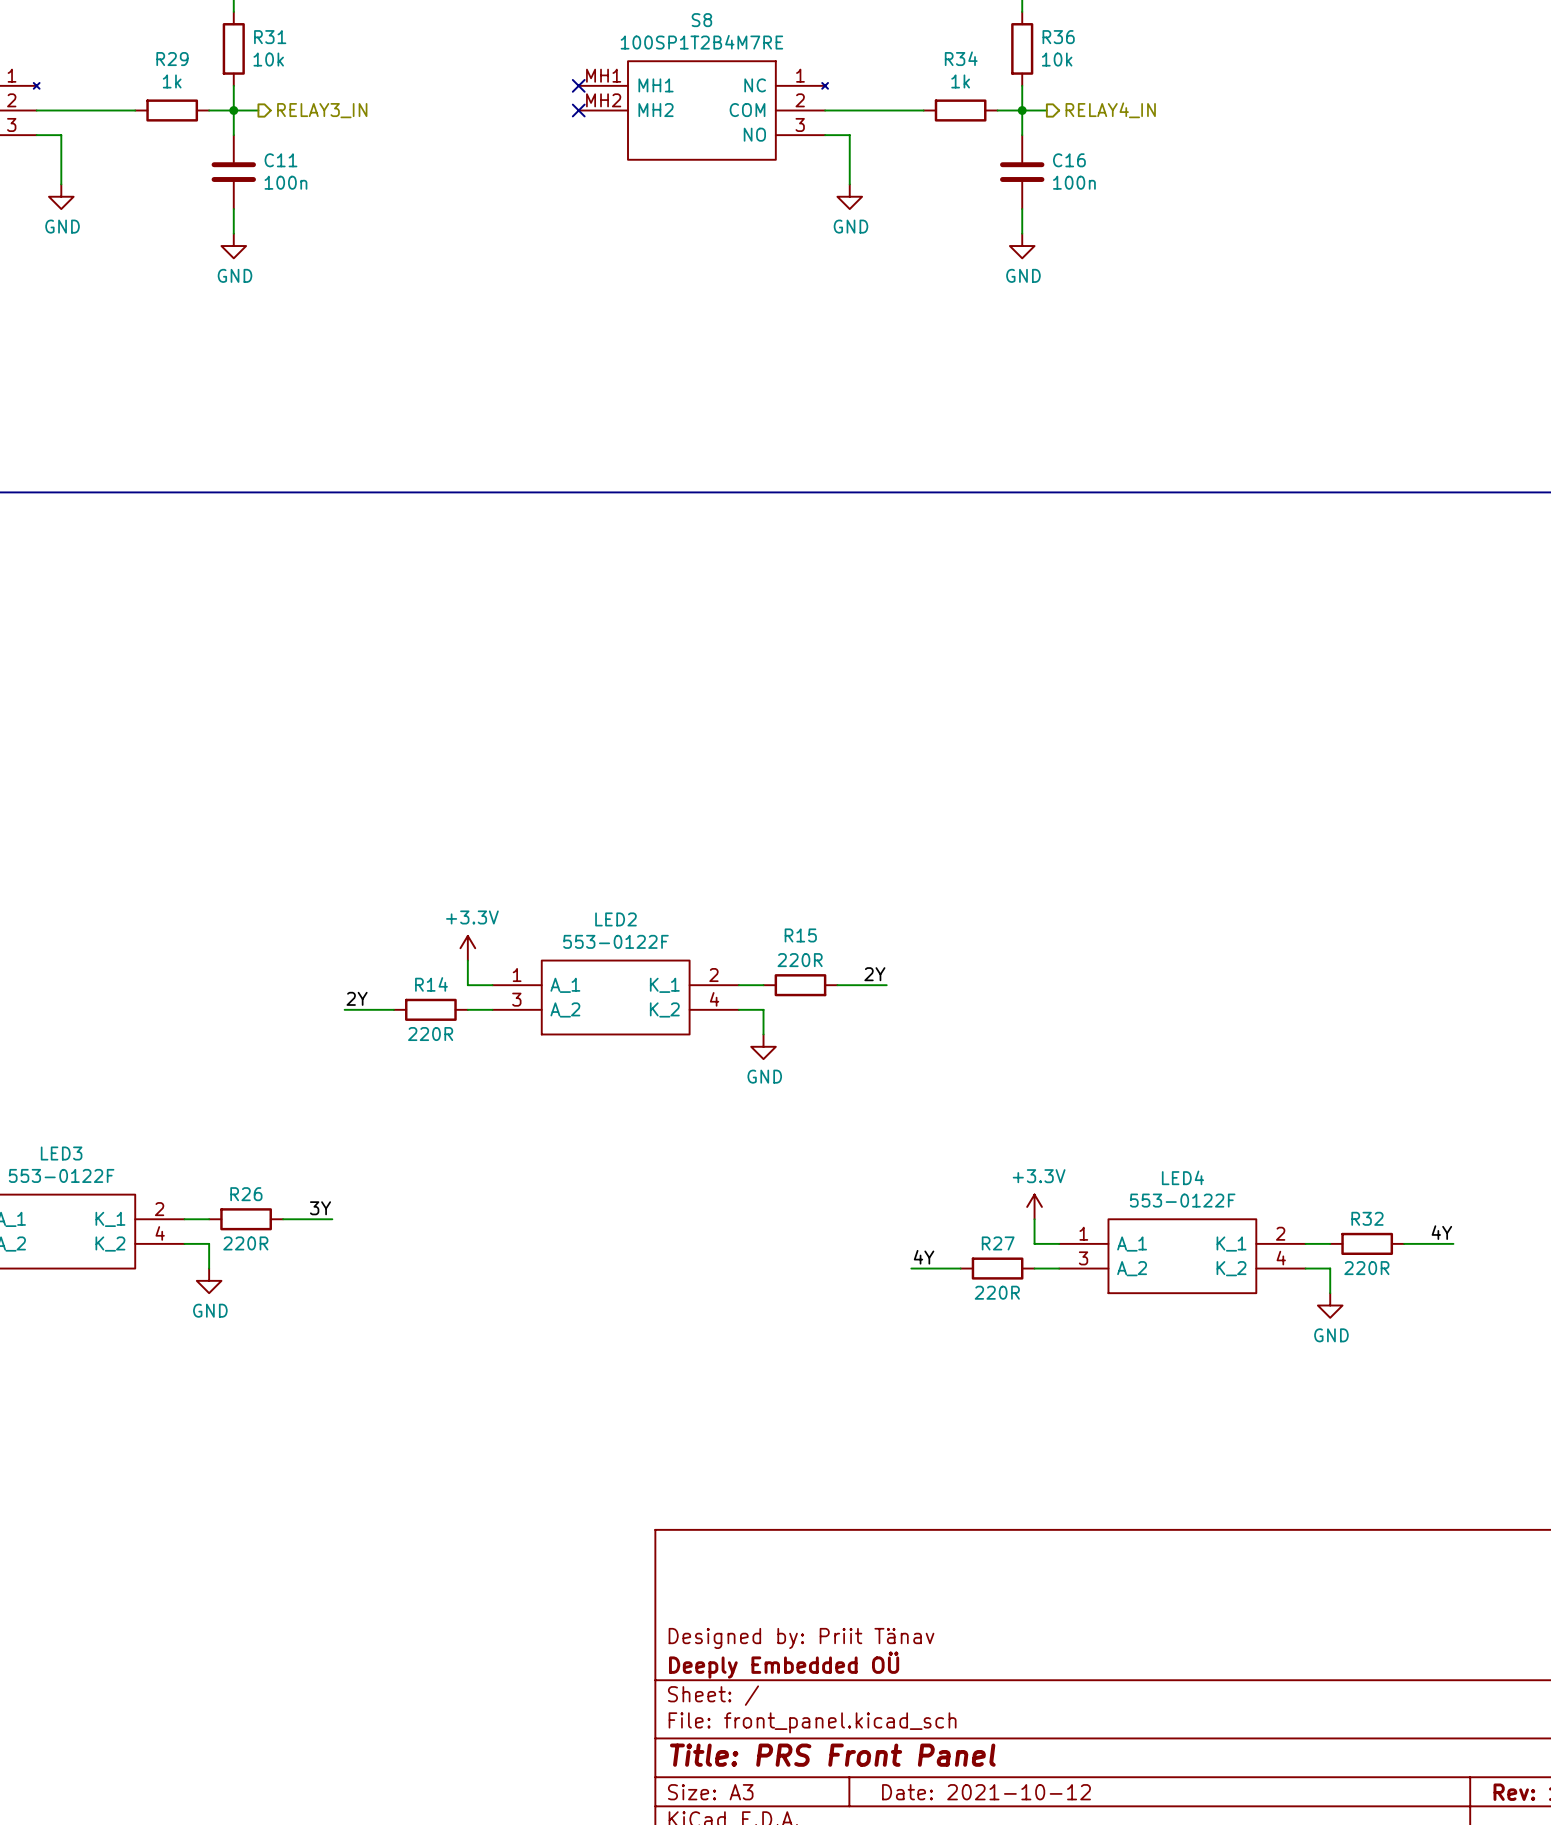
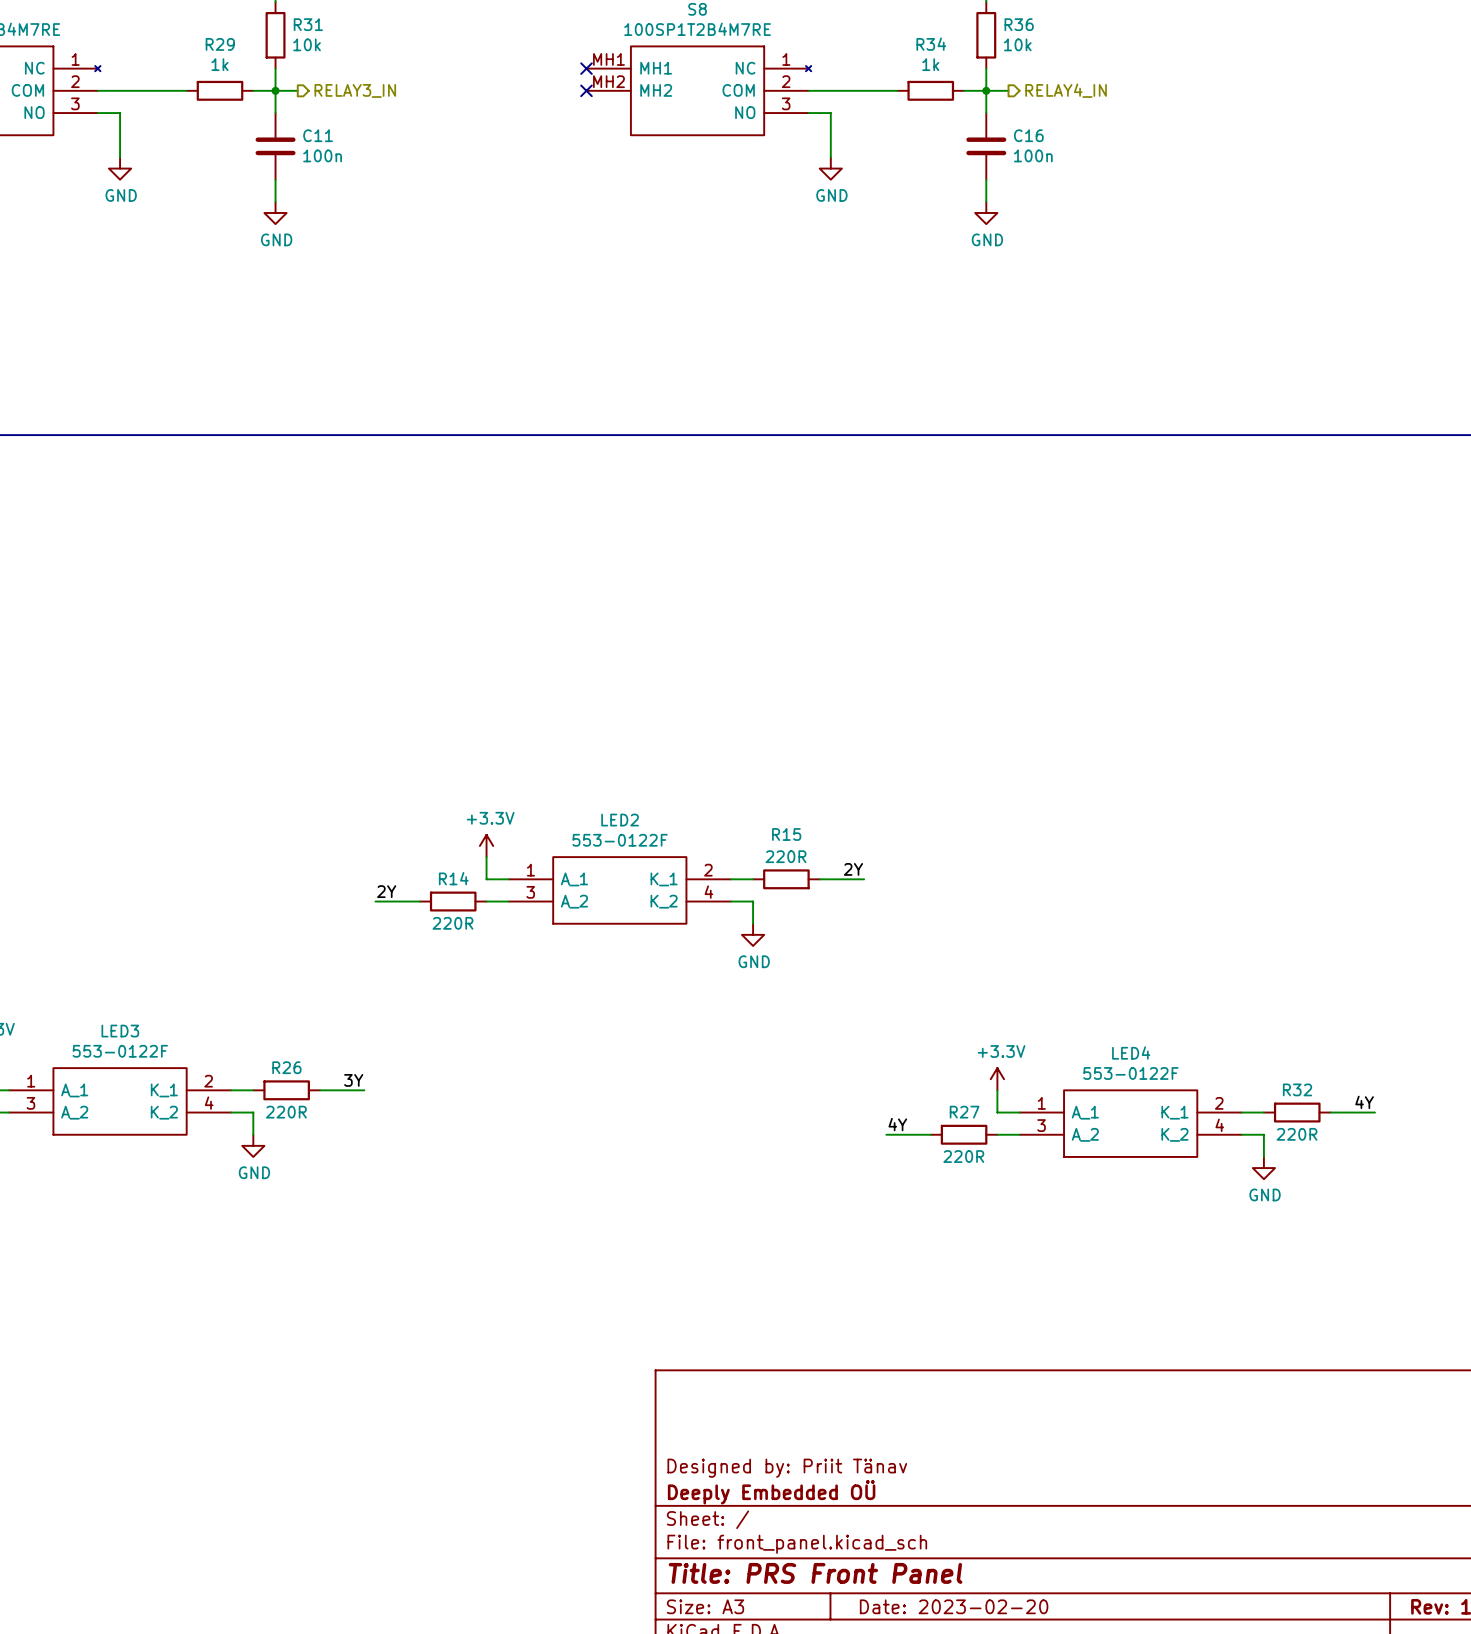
title block: Date: 2021-10-12 (986, 1792) -> Date: 2023-02-20 (954, 1606)

